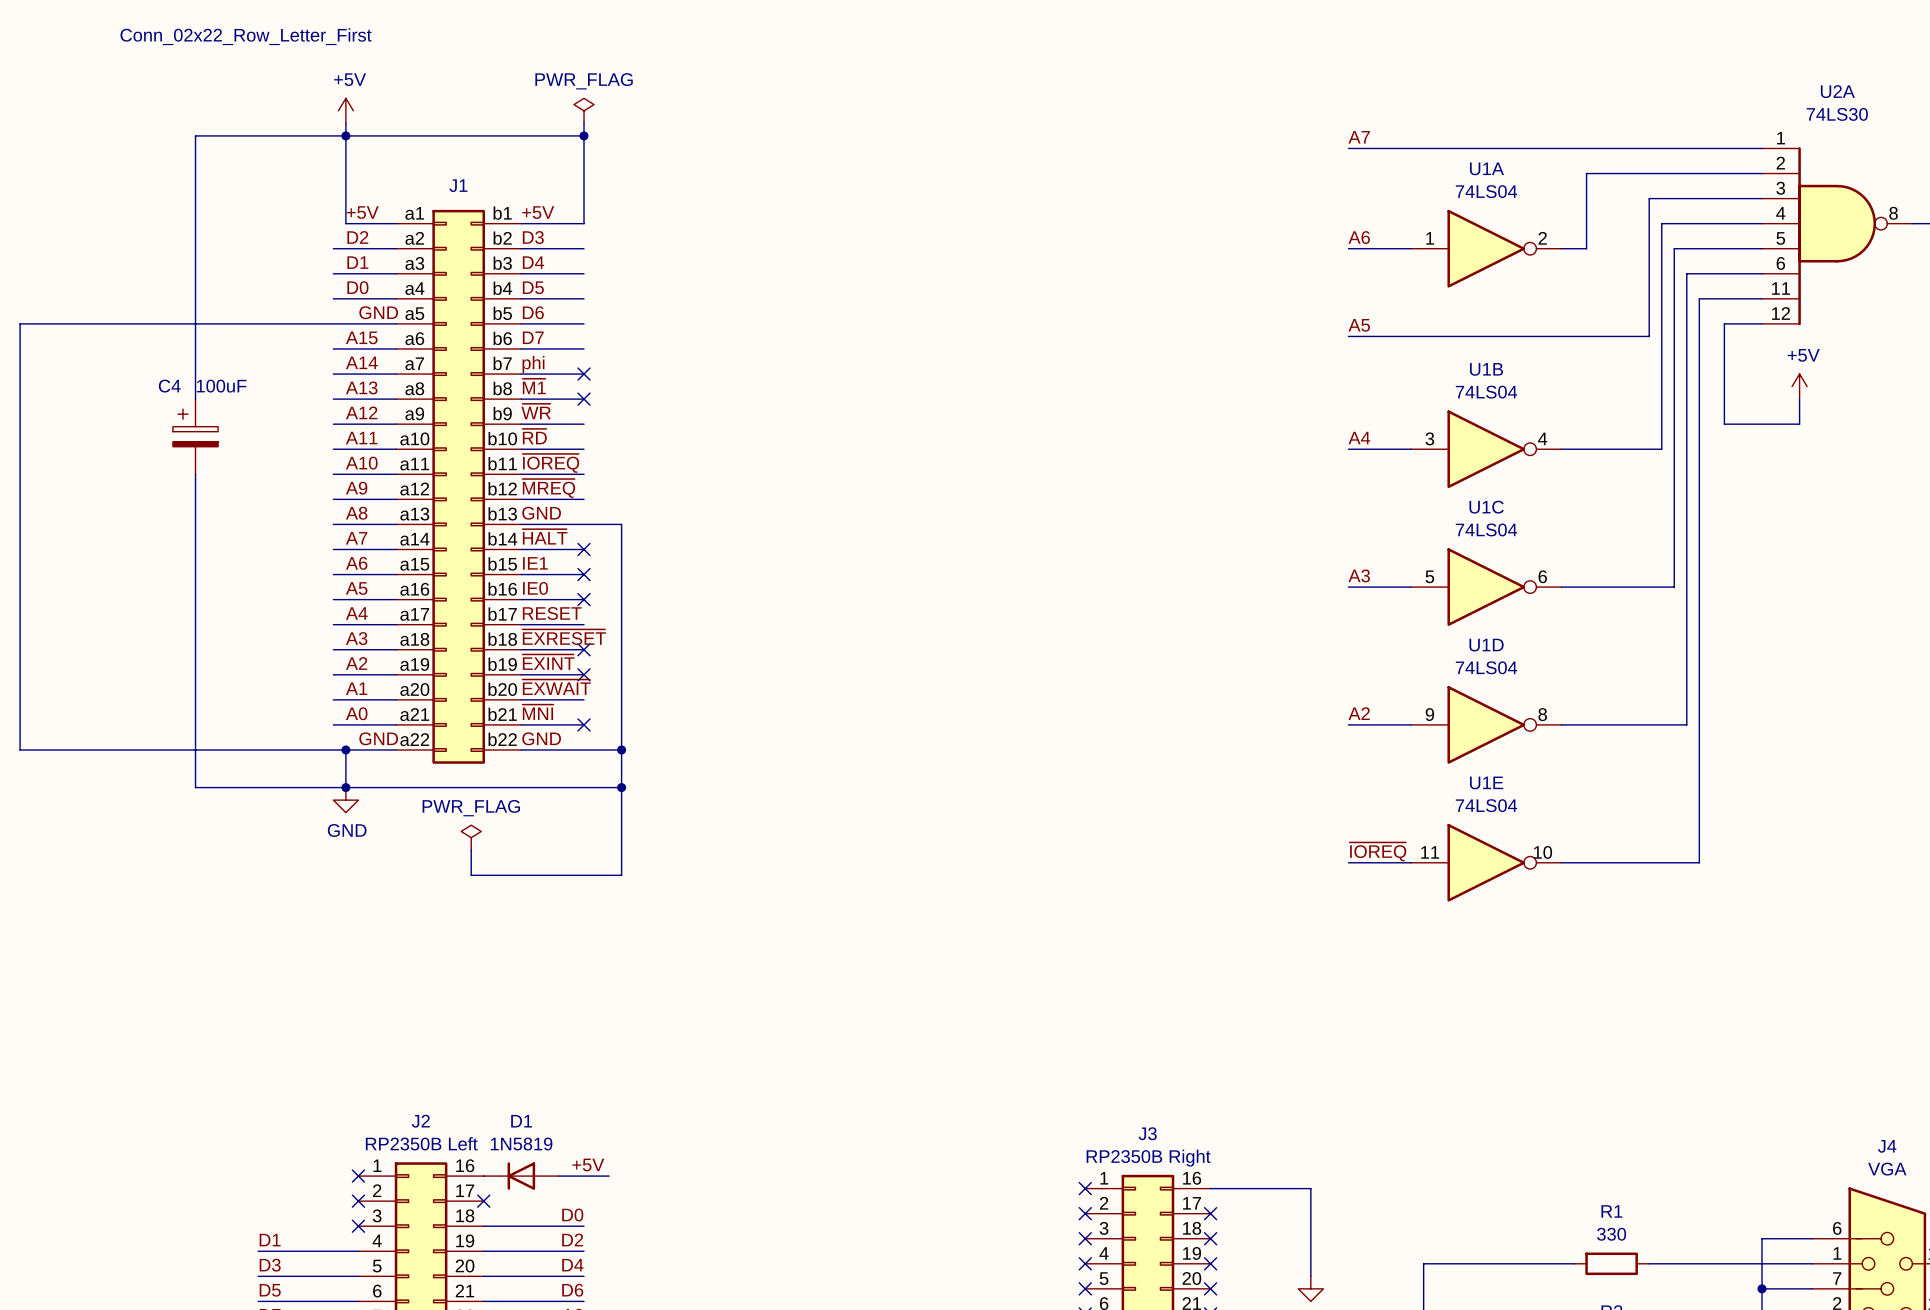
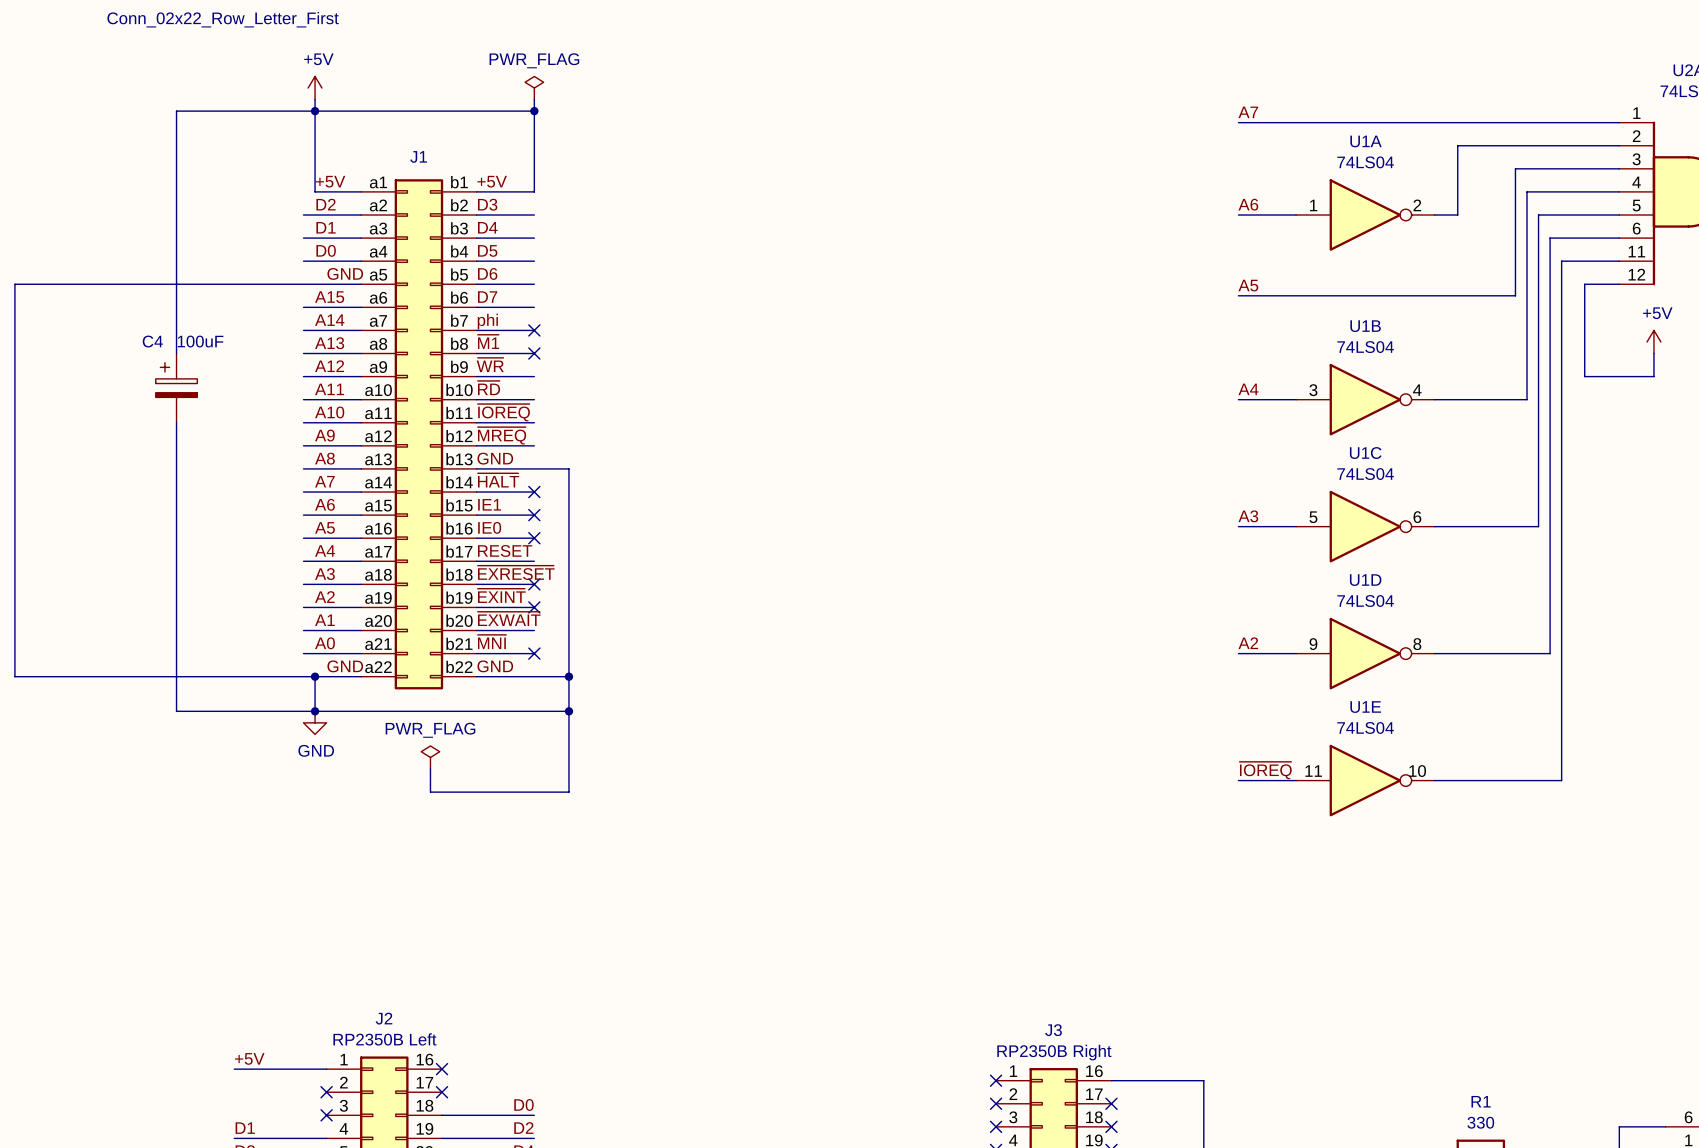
label: none -> +5V (249, 1058)
label: +5V (588, 1164) -> none
wire: none -> (234, 1069) (326, 1069)
no-connect mark: (358, 1176) -> none
no-connect mark: none -> (442, 1069)
D1: 1N5819 (521, 1176) -> none
wire: (558, 1176) (609, 1176) -> none

